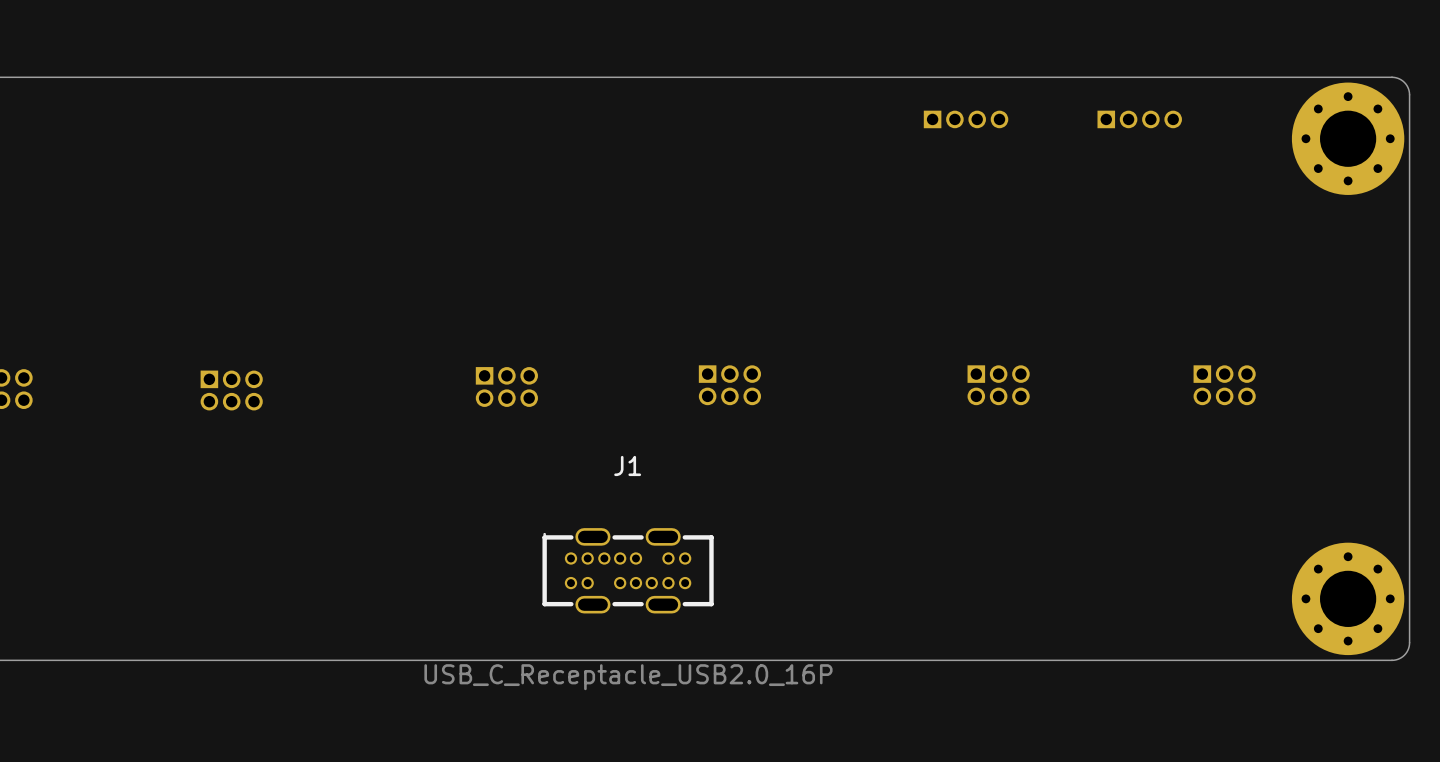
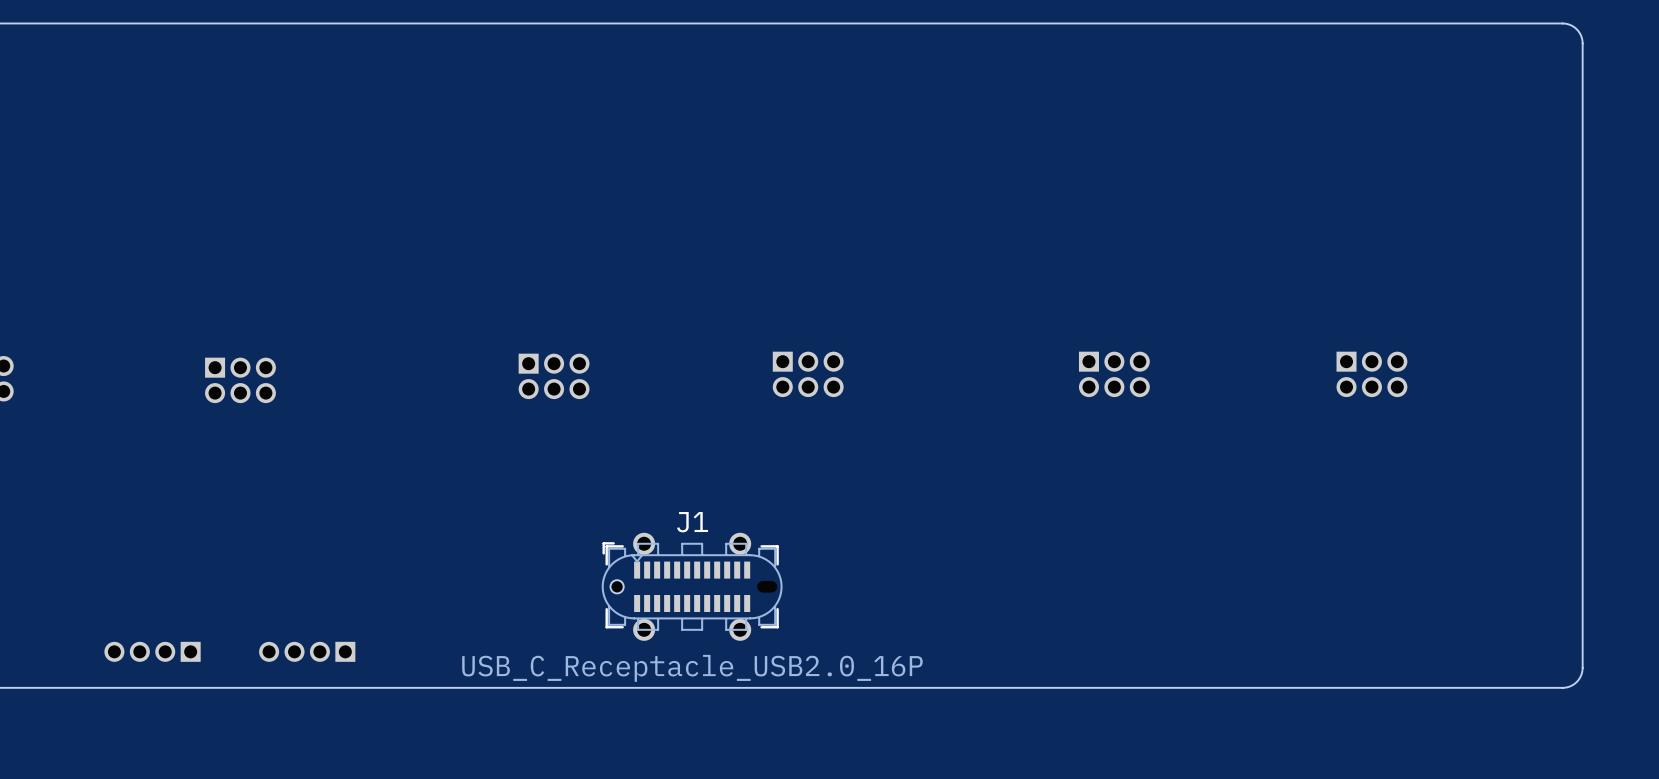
part: (966, 119) -> none
part: (1139, 119) -> none
part: (1348, 138) -> none
J1 name position: J1 (627, 465) -> J1 (692, 522)
J1 footprint: [542, 528, 714, 614] -> [601, 532, 783, 641]
part: (1348, 598) -> none
part: none -> (152, 651)
part: none -> (307, 651)

